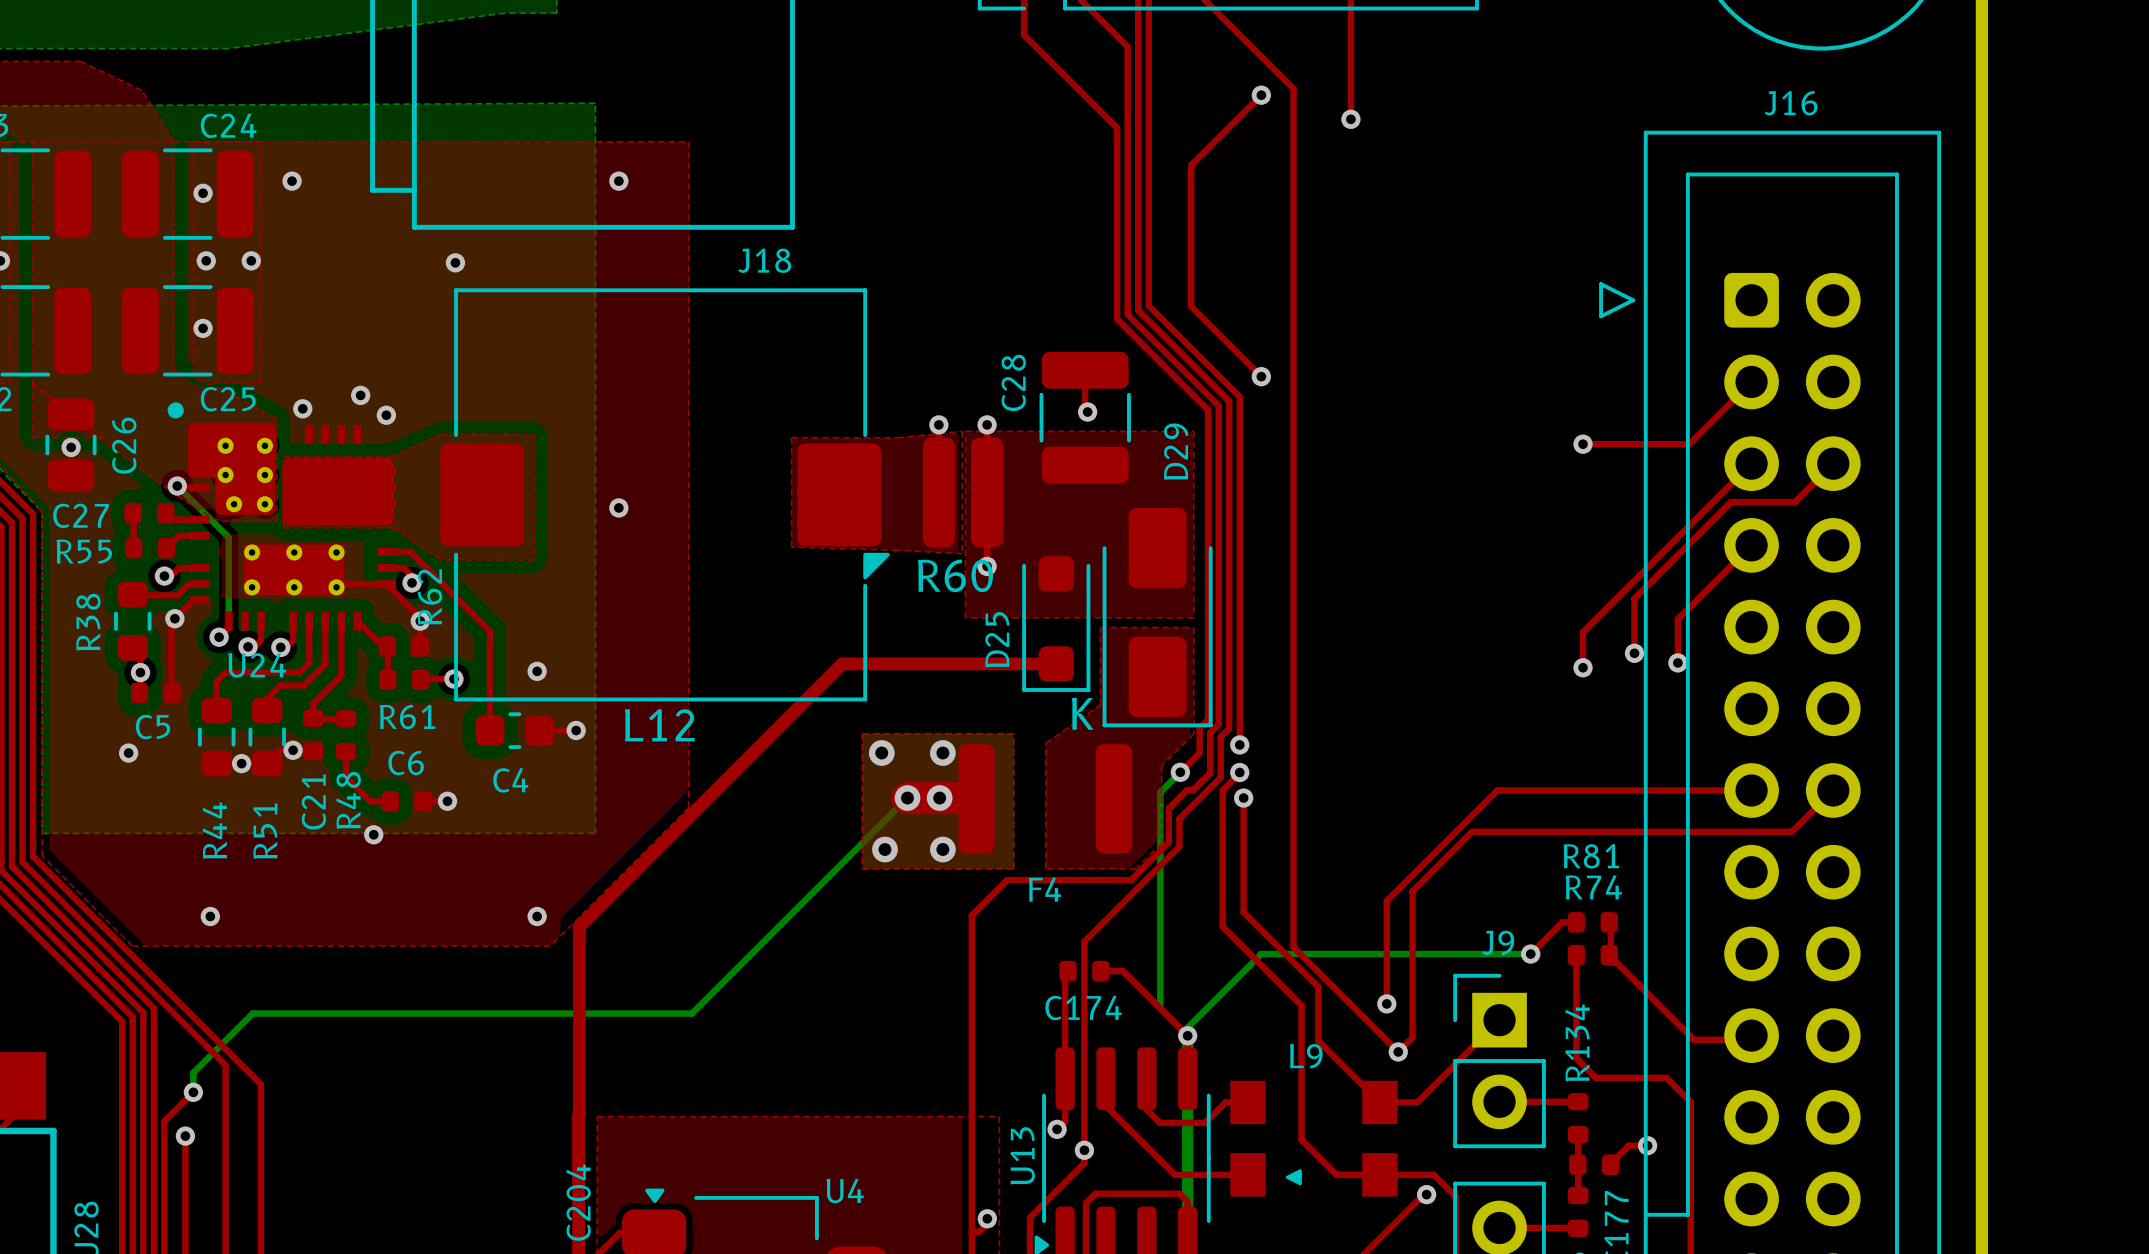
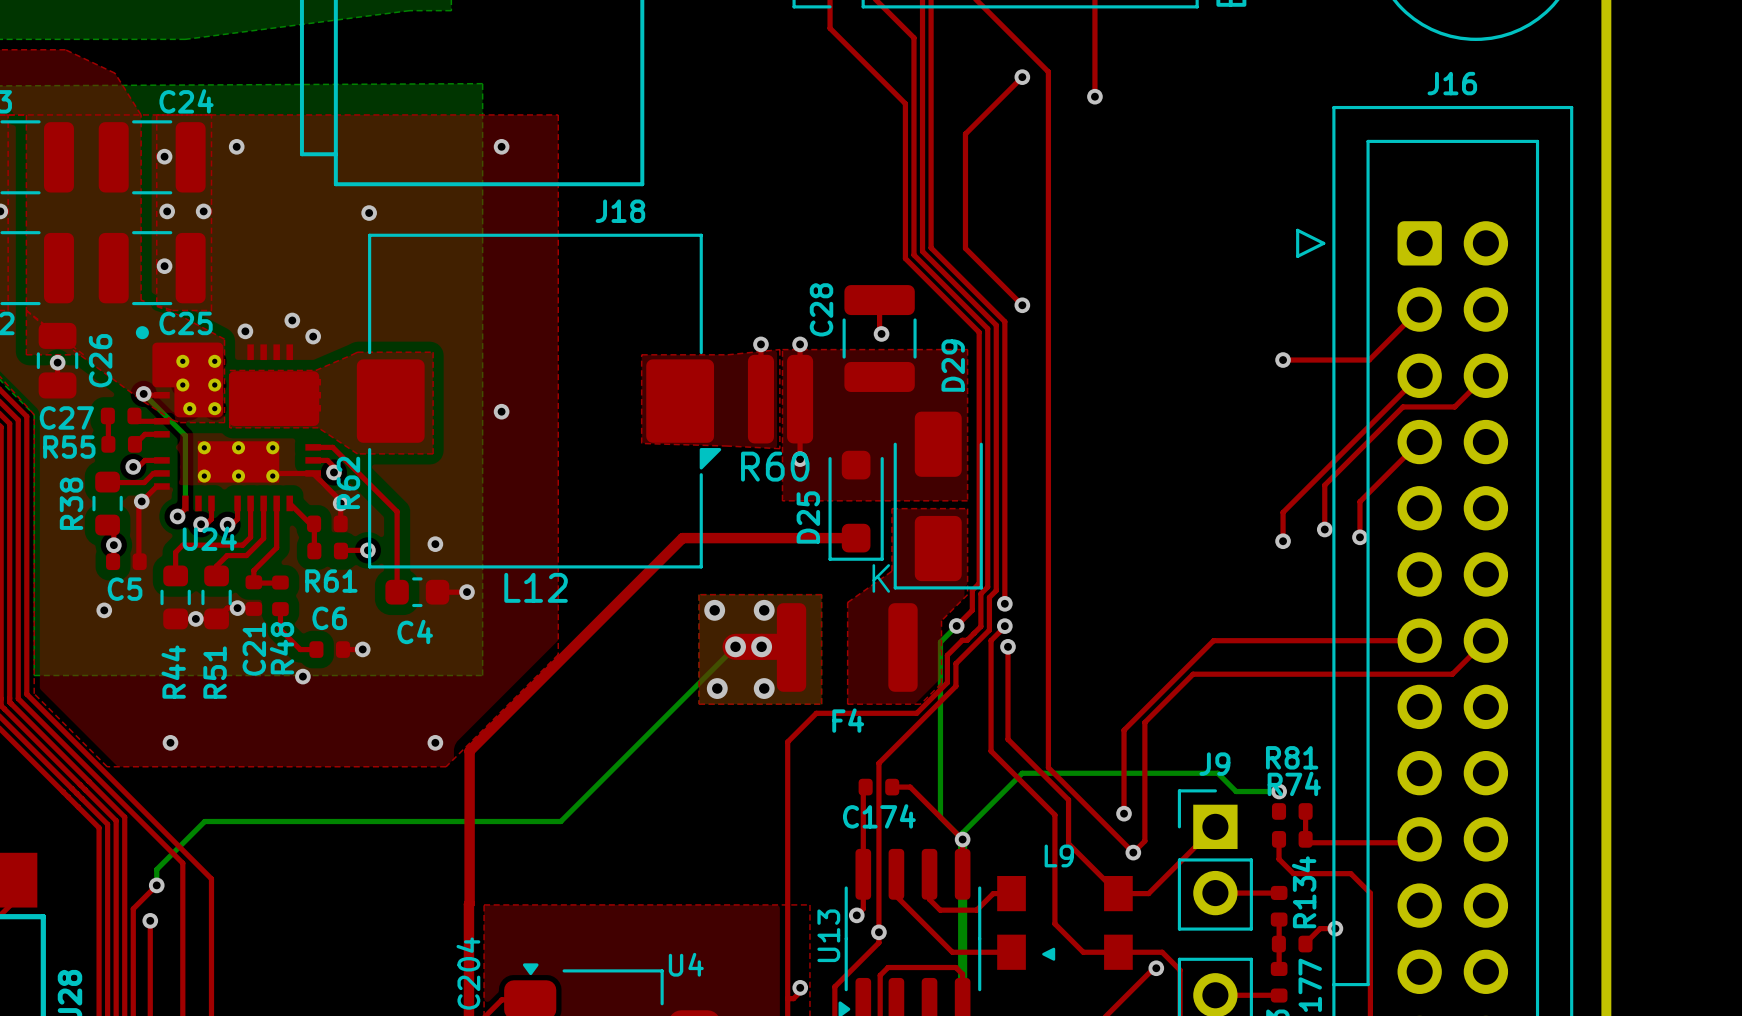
top track: (1576, 922) (1562, 922) (1530, 954) -> none
R81 position: (1592, 922) -> (1292, 811)
top track: (1609, 922) (1610, 923) (1610, 953) (1609, 955) (1693, 1039) -> (1305, 815) (1305, 842) (1372, 842)
bottom track: (1502, 954) (1530, 954) -> (1217, 773) (1236, 791) (1279, 791)
via position: (1530, 954) -> (1279, 791)
top track: (1576, 955) (1576, 1058) (1578, 1060) -> (1279, 839) (1279, 859)
R74 position: (1592, 955) -> (1292, 839)
R134 name position: R134 (1577, 1042) -> R134 (1304, 892)

